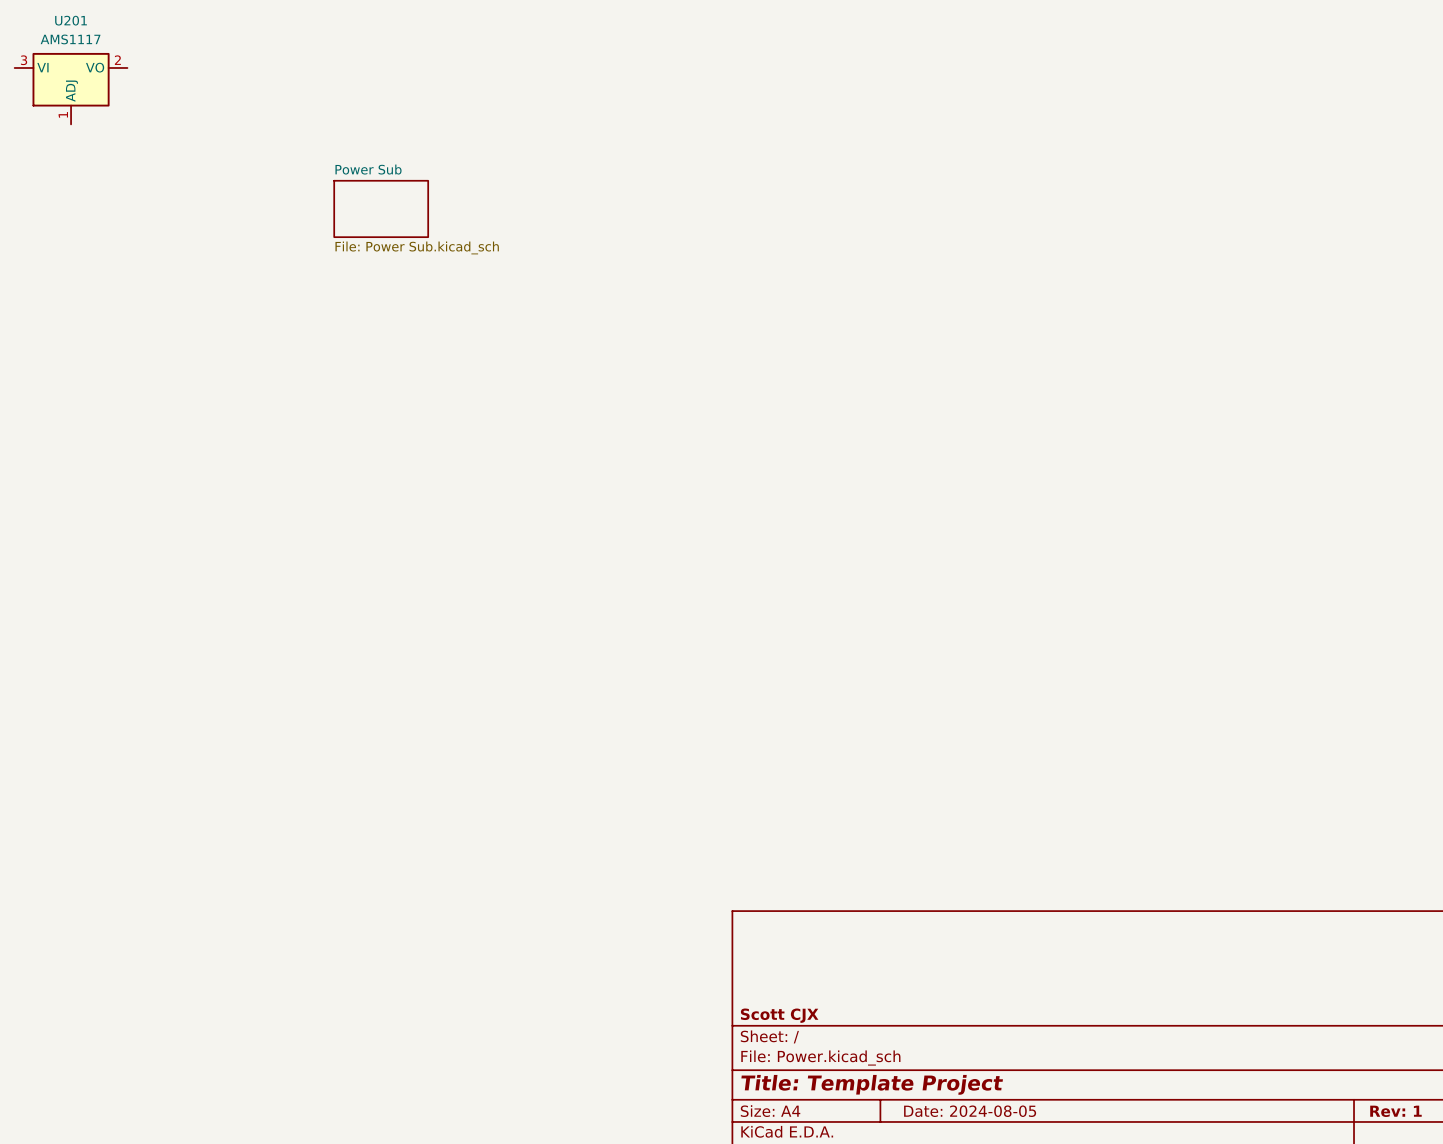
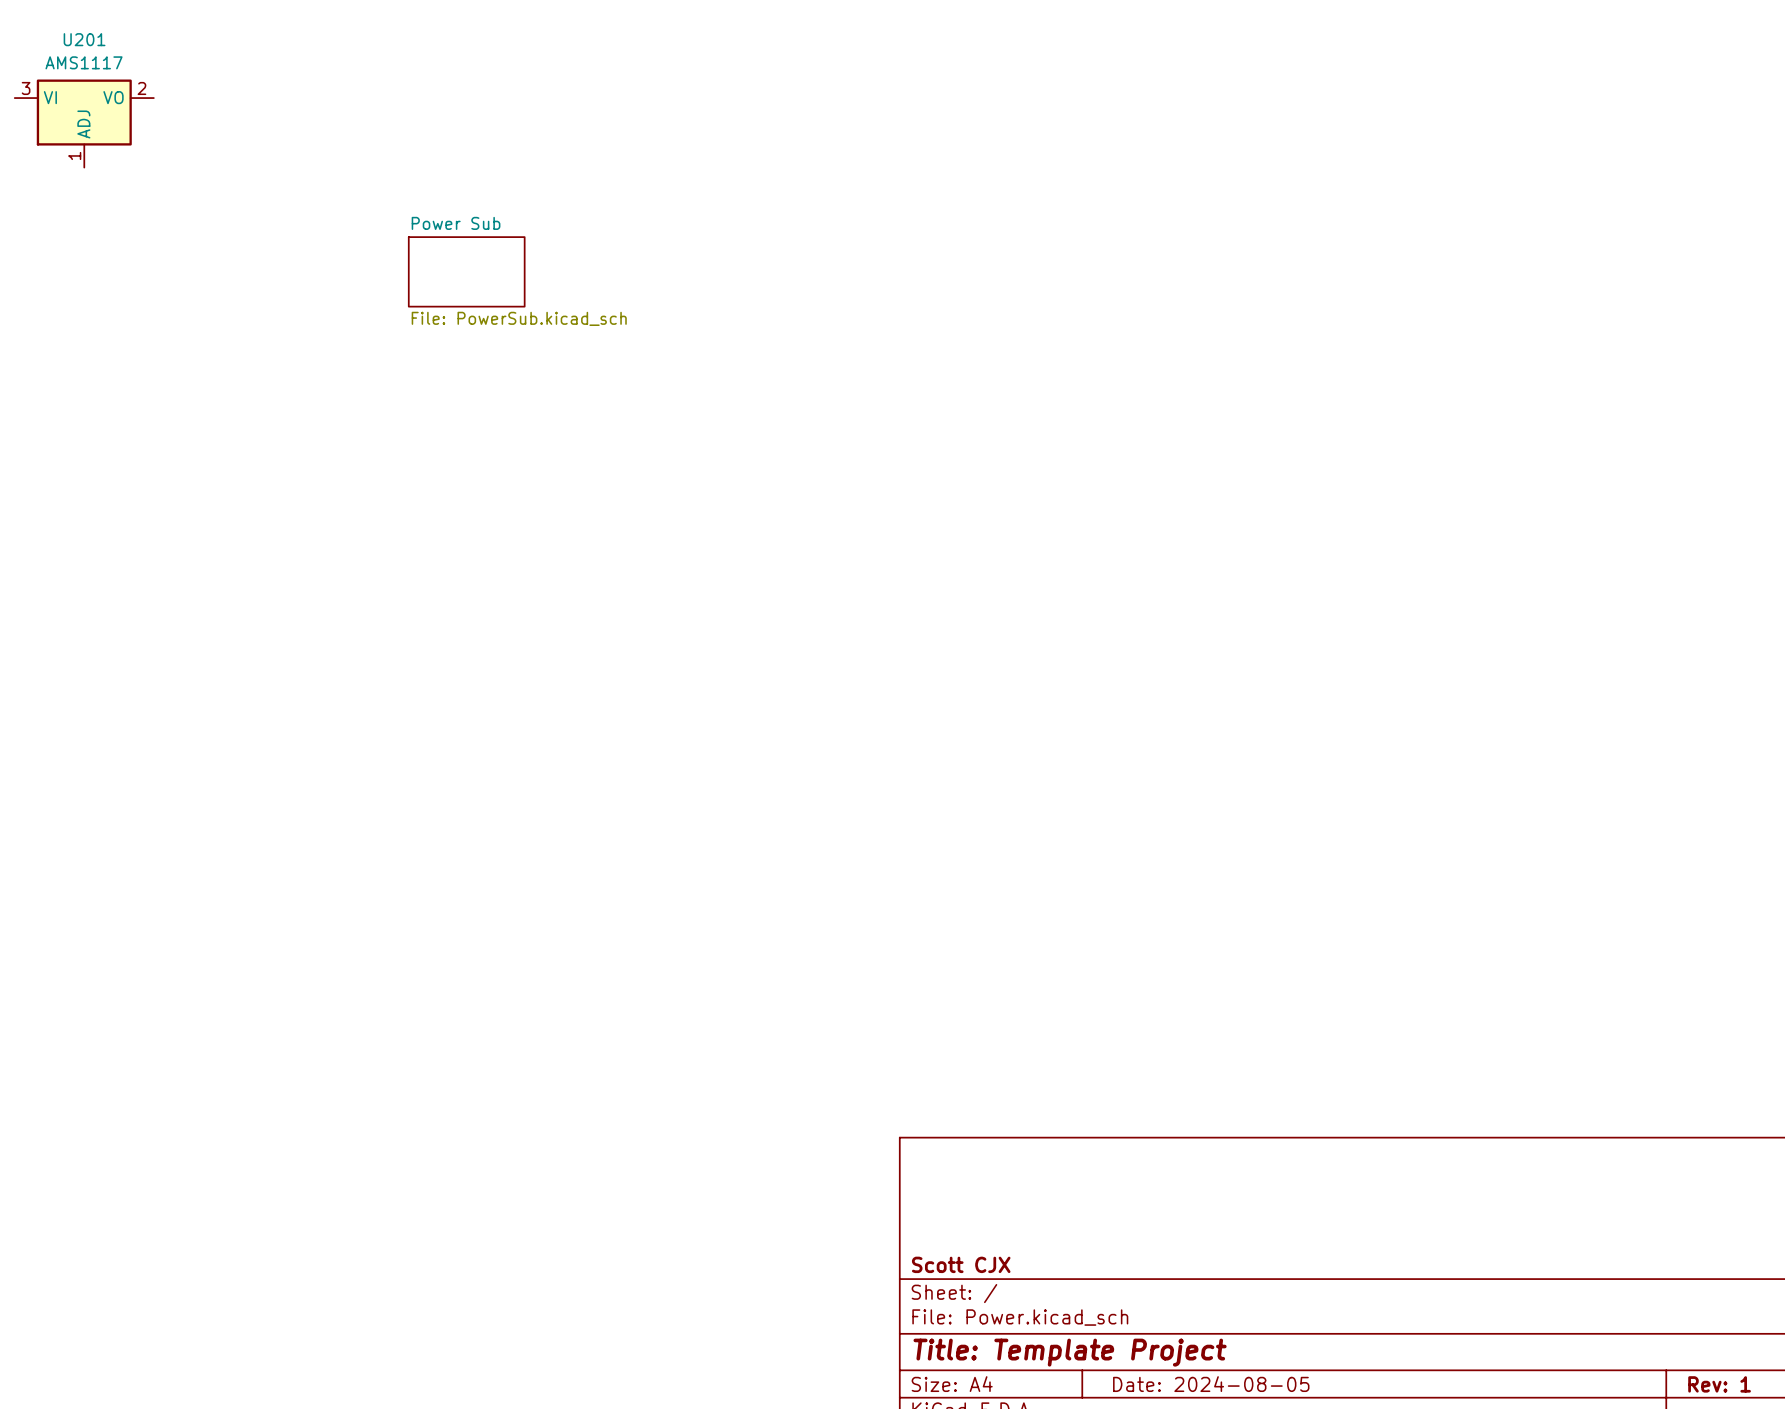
sheet Power Sub value: File: Power Sub.kicad_sch (417, 247) -> File: PowerSub.kicad_sch (519, 318)

